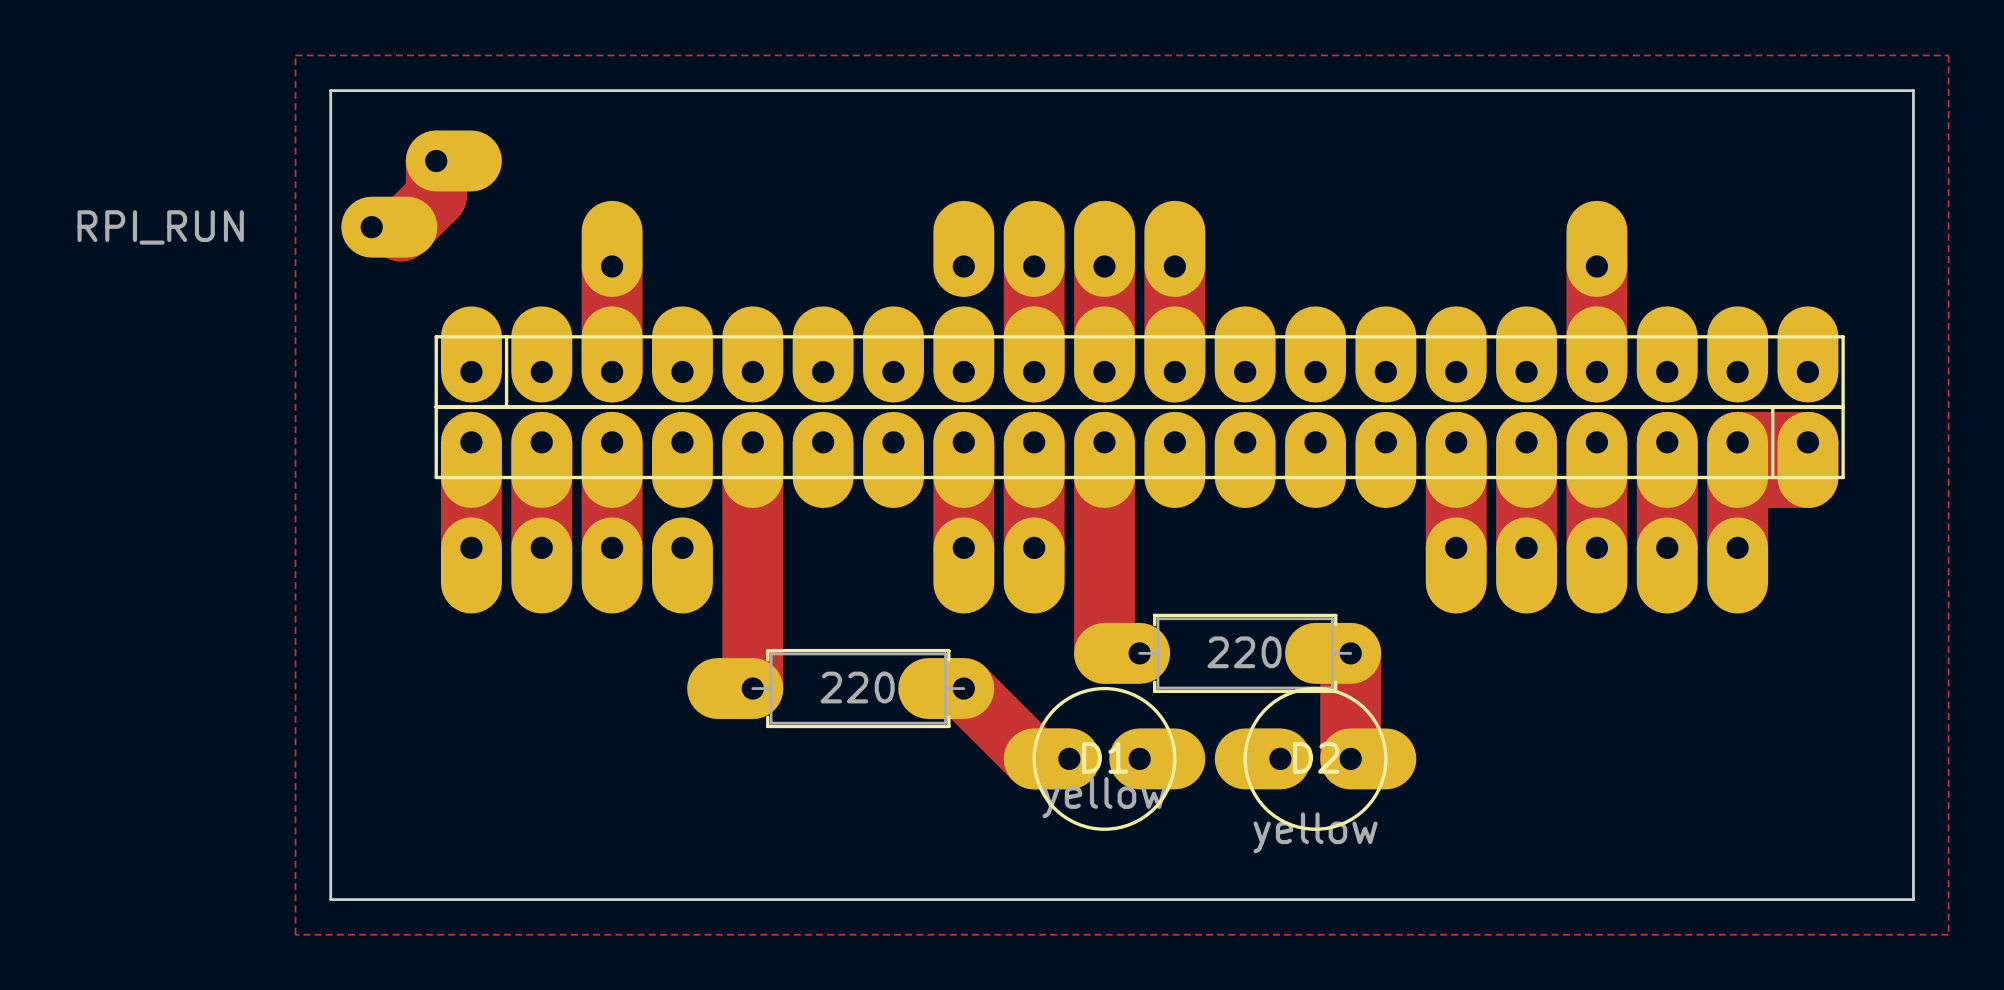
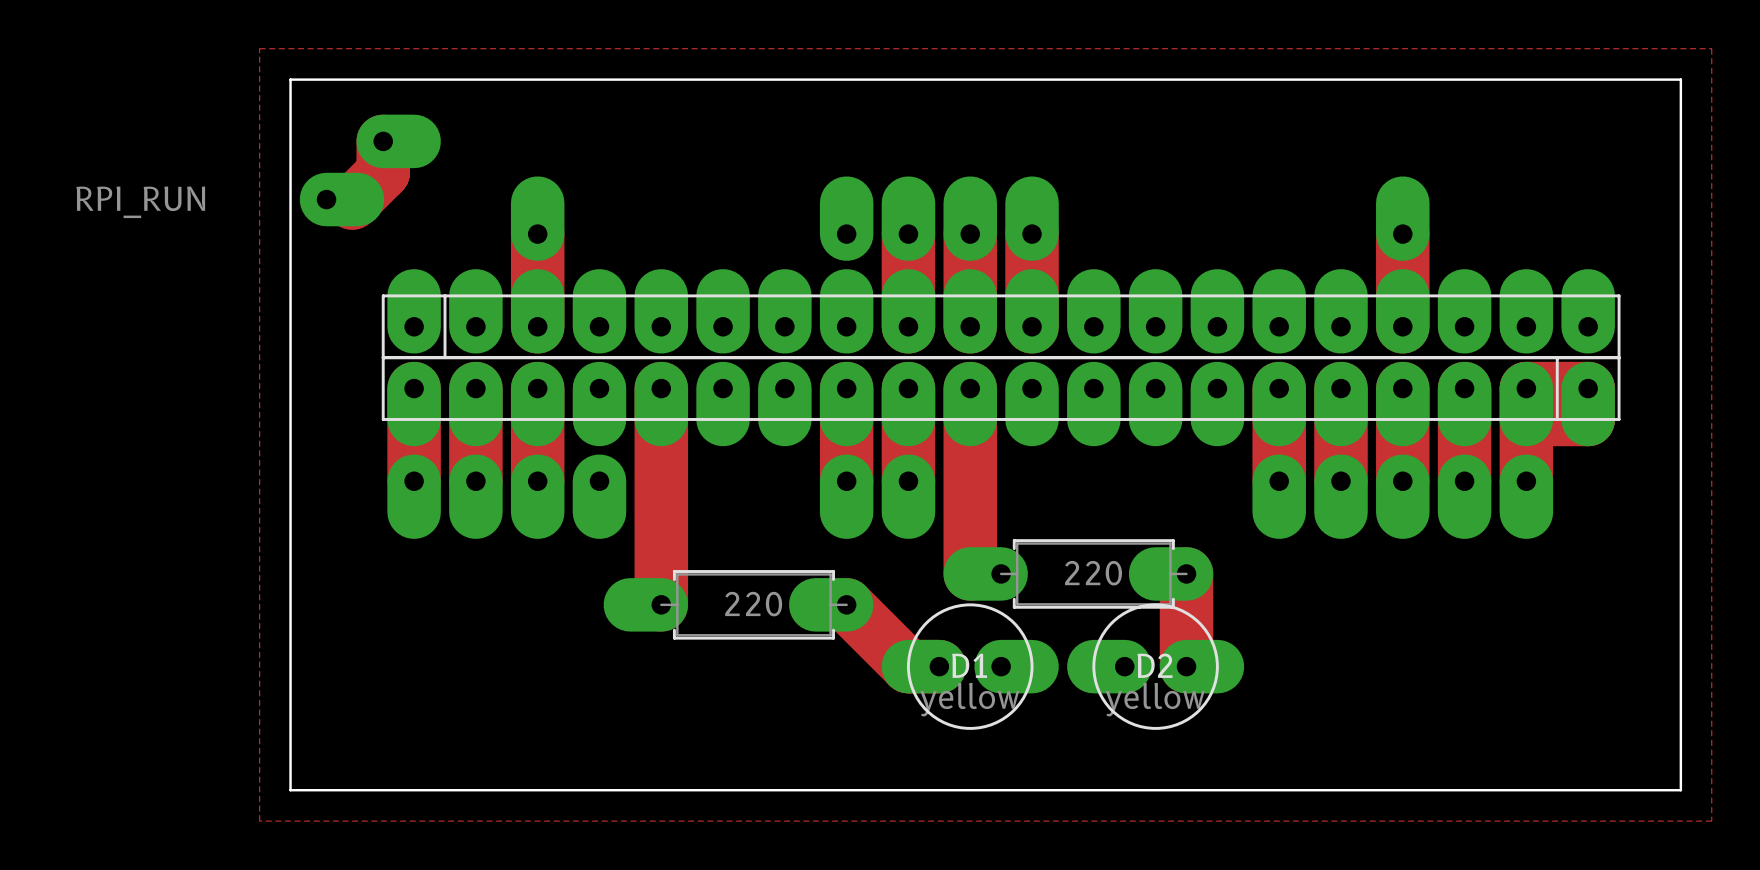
D2 value position: yellow (1315, 832) -> yellow (1155, 699)

